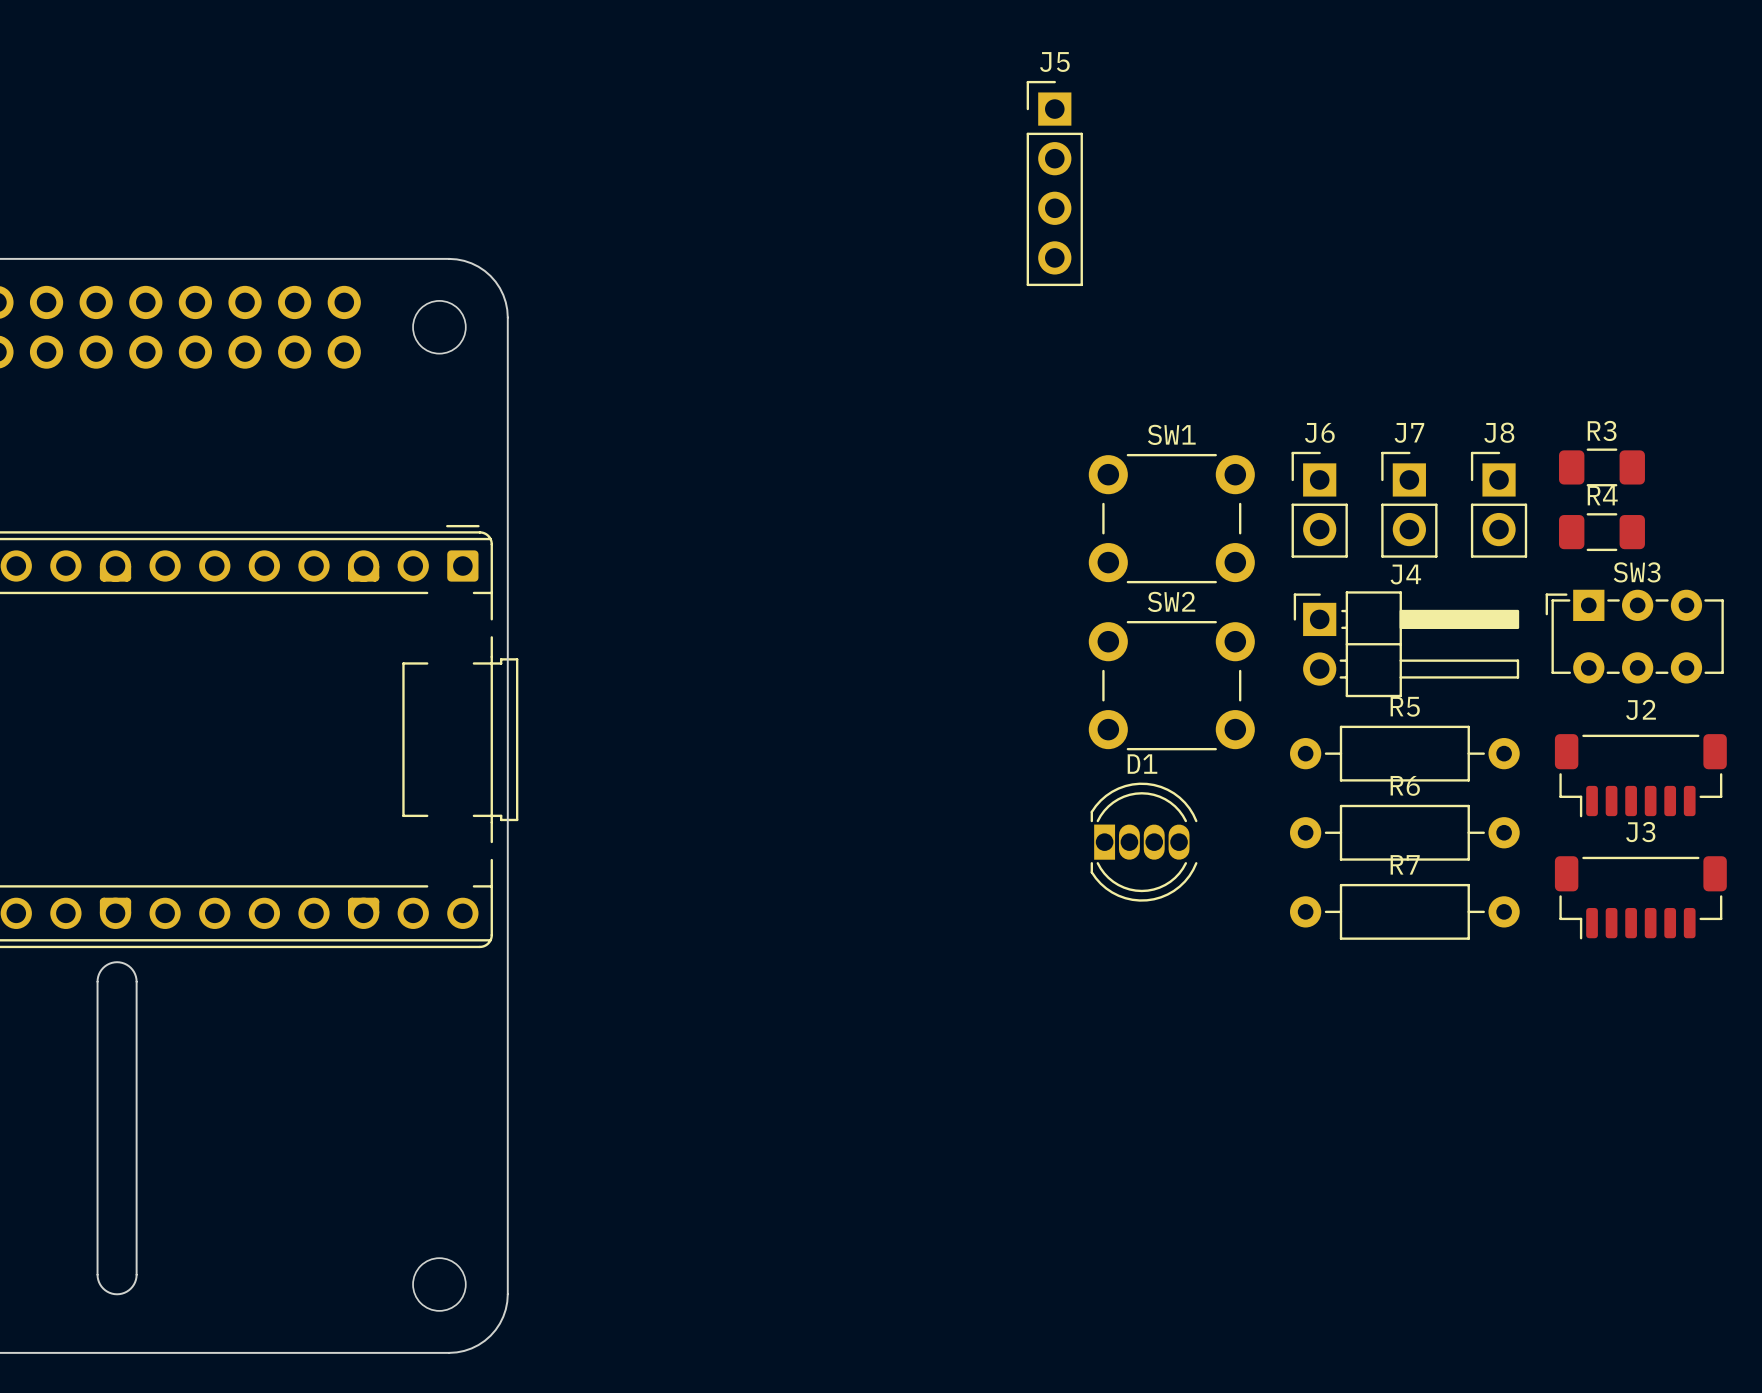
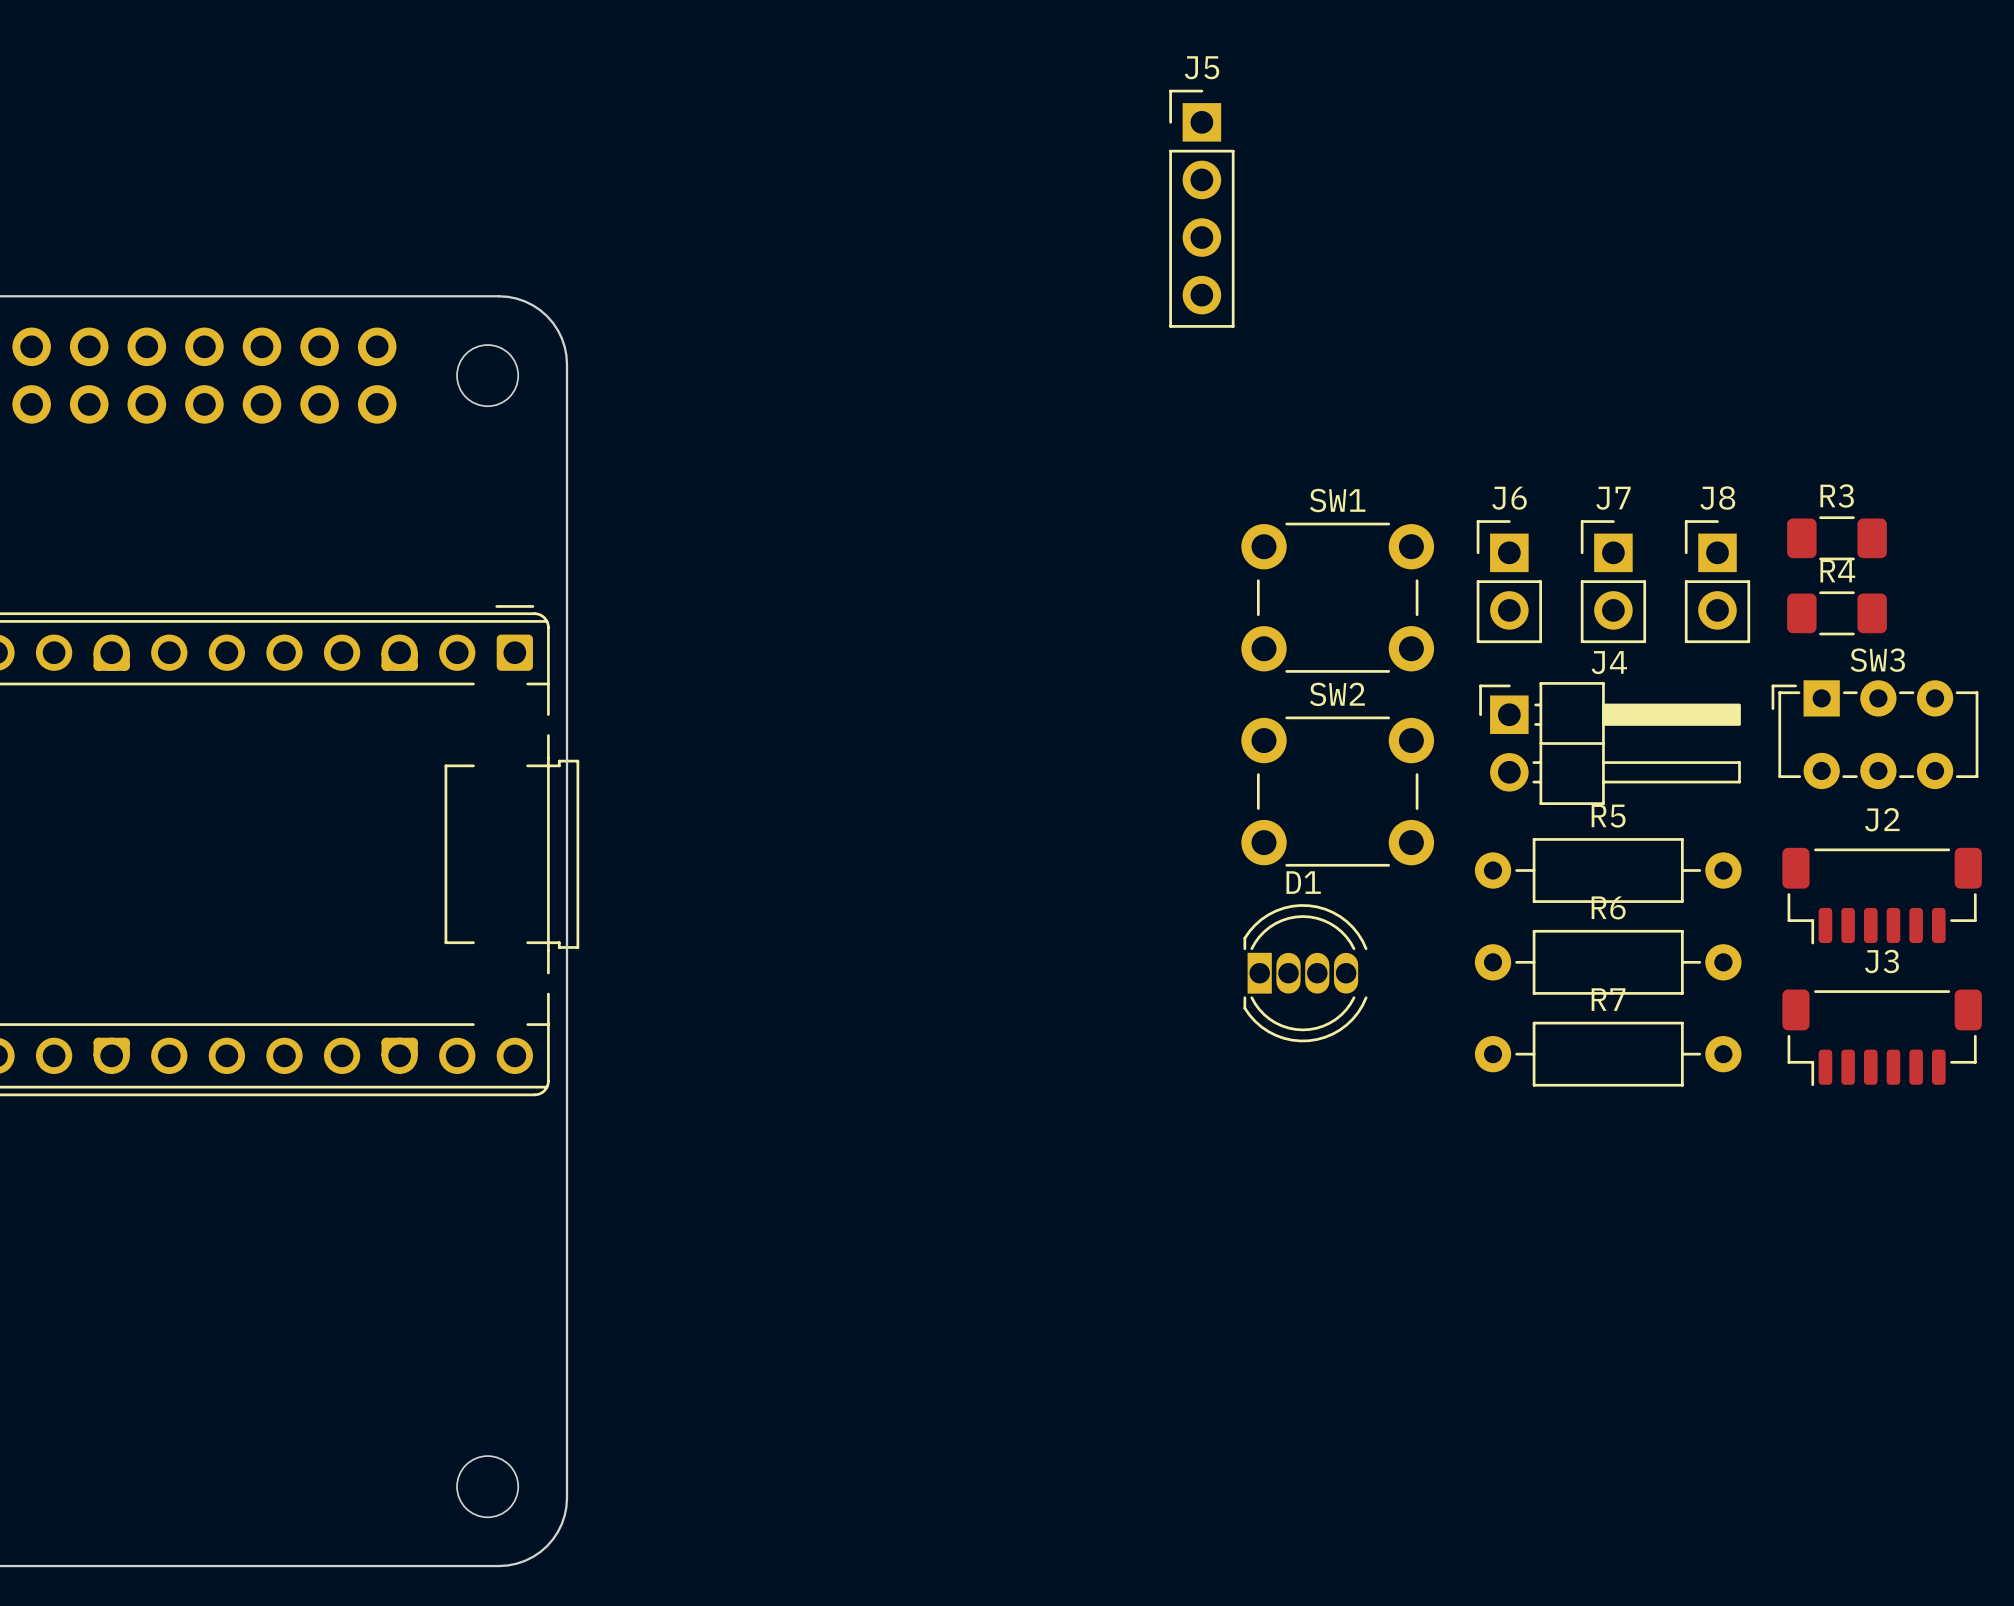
board edge: (97, 981) (97, 1277) (105, 1290) (119, 1294) (132, 1286) (136, 1274) (136, 979) (130, 967) (117, 962) (103, 967) (97, 981) -> none

